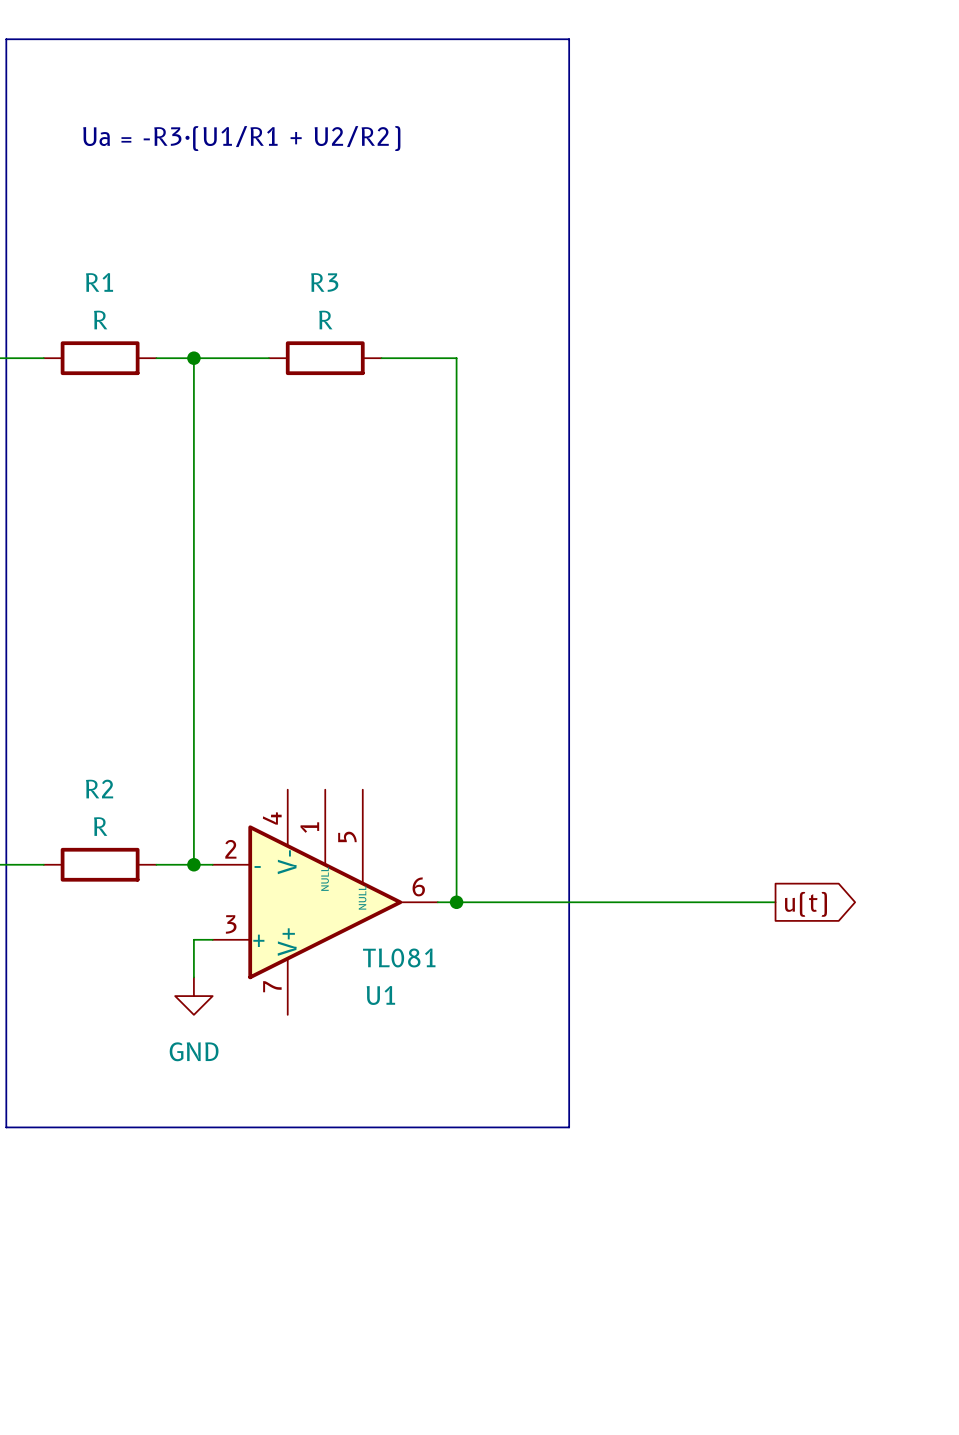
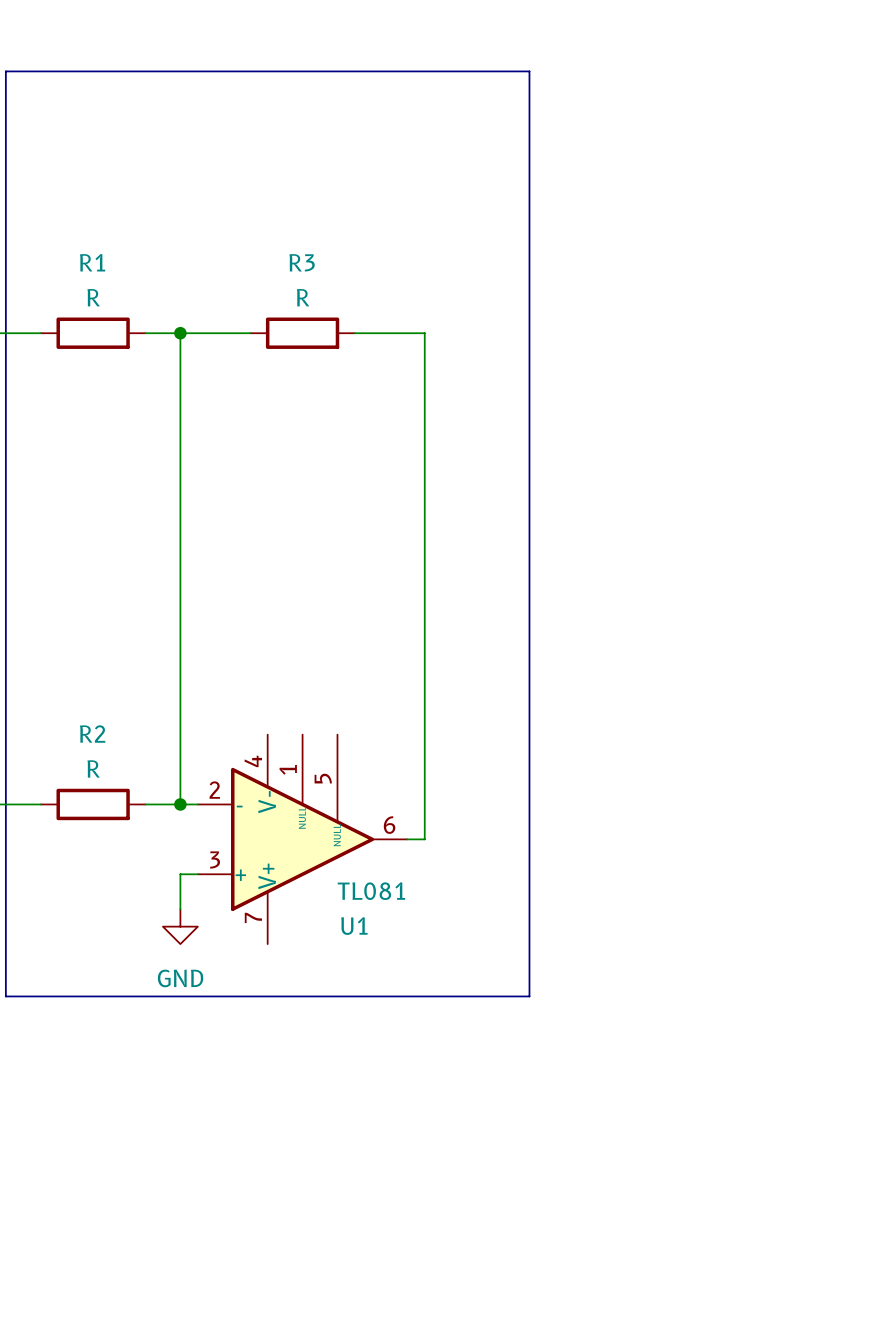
line: (6, 76) (6, 39) (569, 39) (569, 76) -> (5, 71) (529, 71)
text: Ua = -R3·(U1/R1 + U2/R2) (241, 138) -> none
wire: (456, 902) (775, 902) -> none
junction: (456, 902) -> none
global label: u(t) (806, 904) -> none
line: (6, 1071) (6, 1127) (569, 1127) (569, 1071) -> (5, 996) (529, 996)

